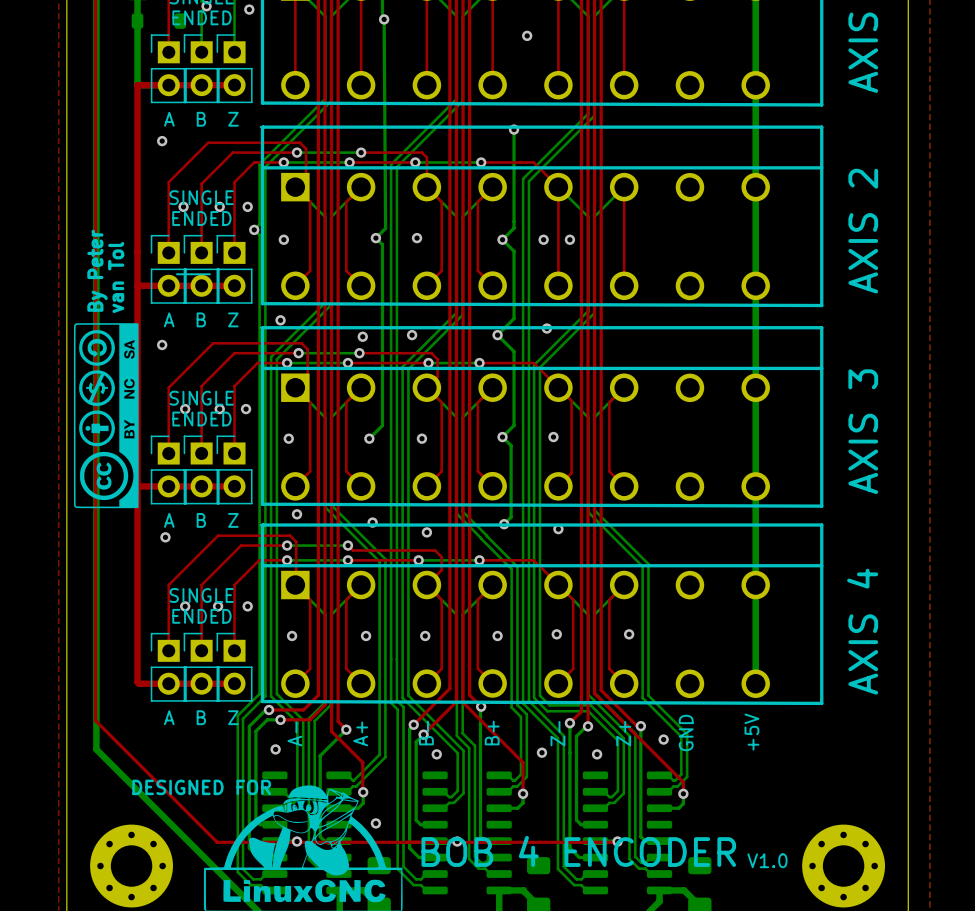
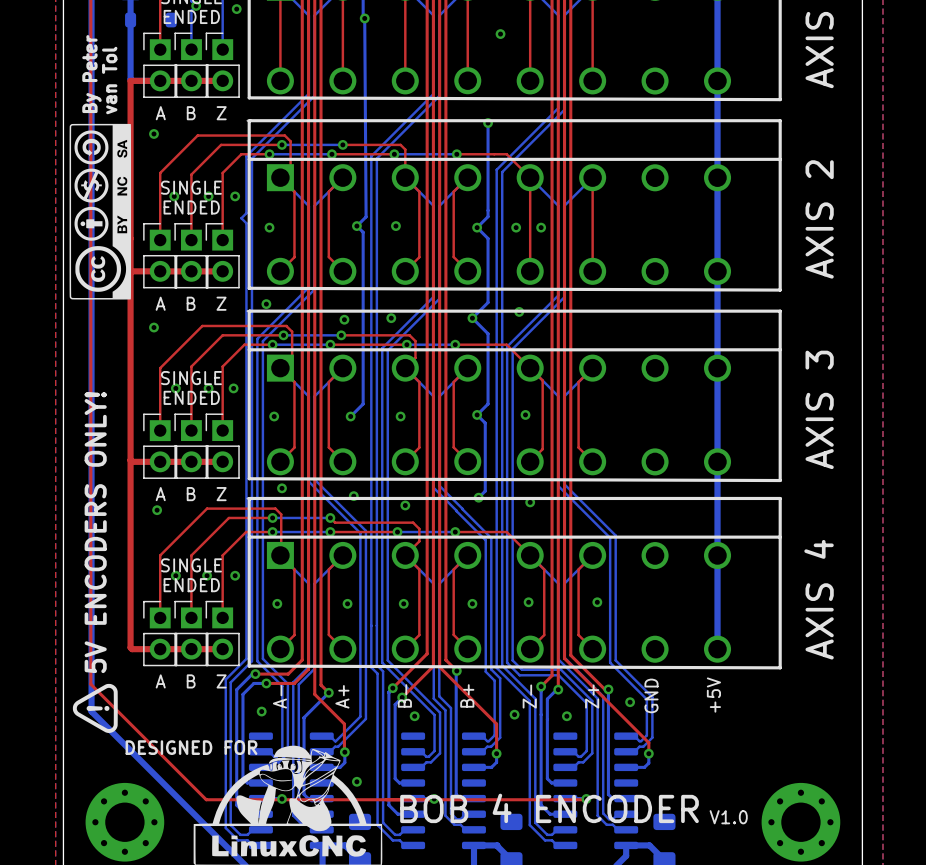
via: (254, 229) -> none
text position: By Peter (97, 270) -> By Peter (91, 74)
line: (176, 274) (209, 274) -> none
text position: van Tol (116, 277) -> van Tol (109, 80)
drawing position: (106, 415) -> (100, 211)
text: none -> 5V ENCODERS ONLY! (95, 532)
drawing: none -> [72, 683, 118, 733]

